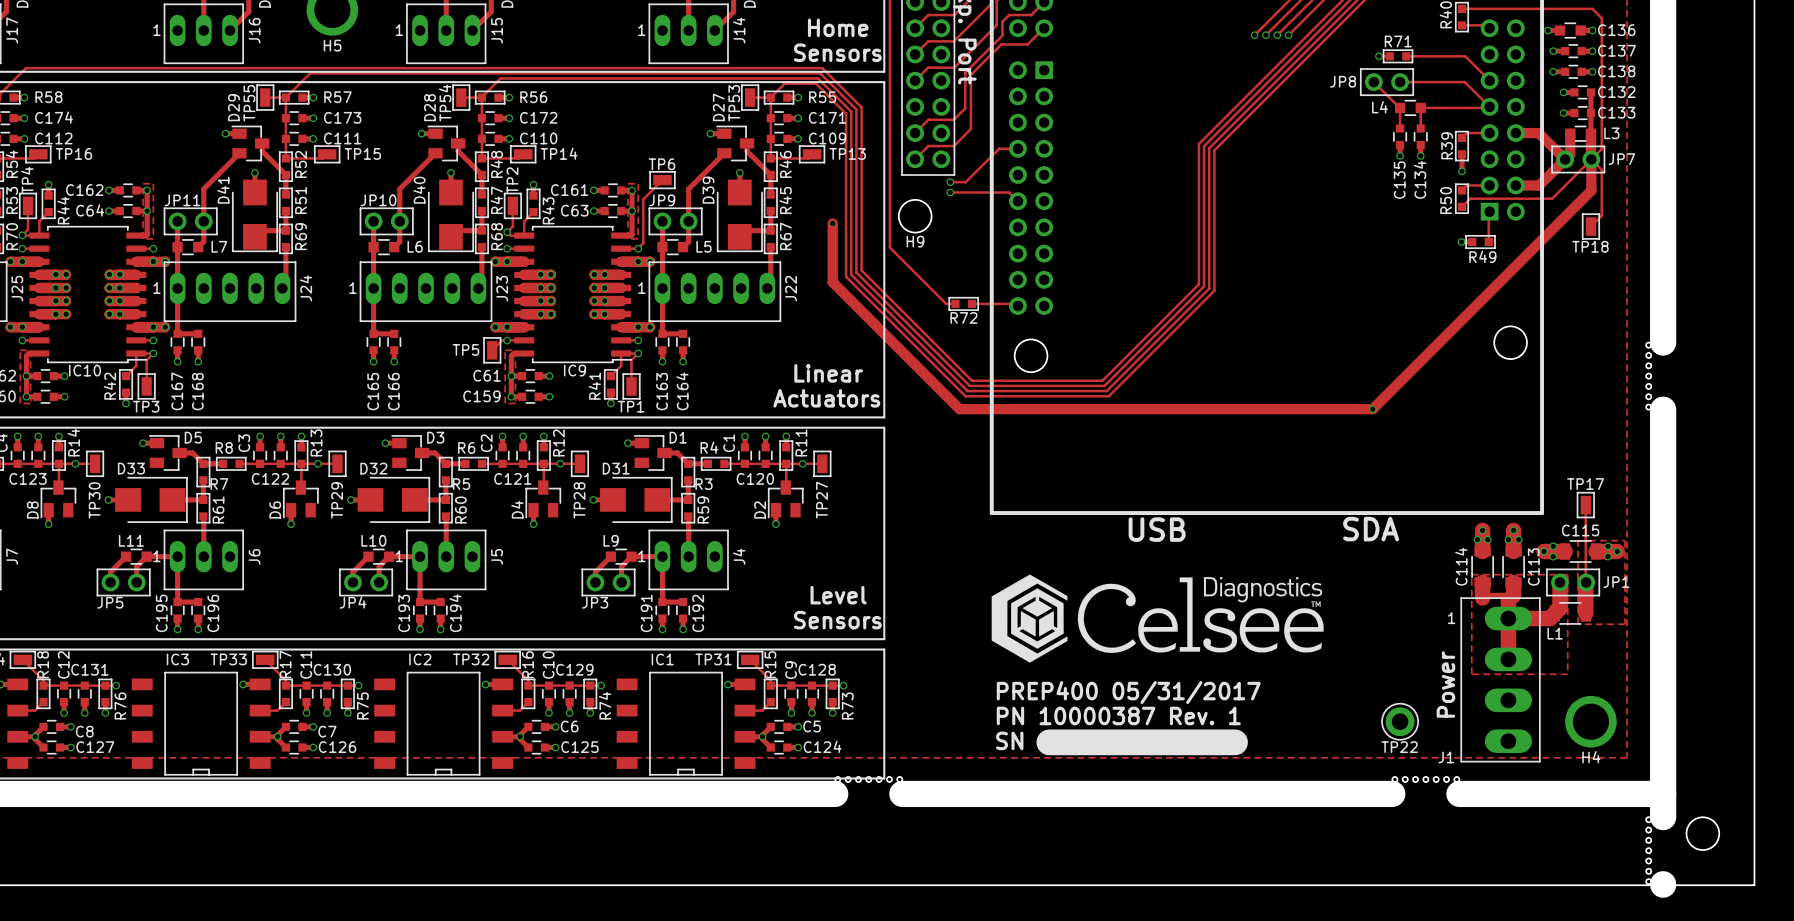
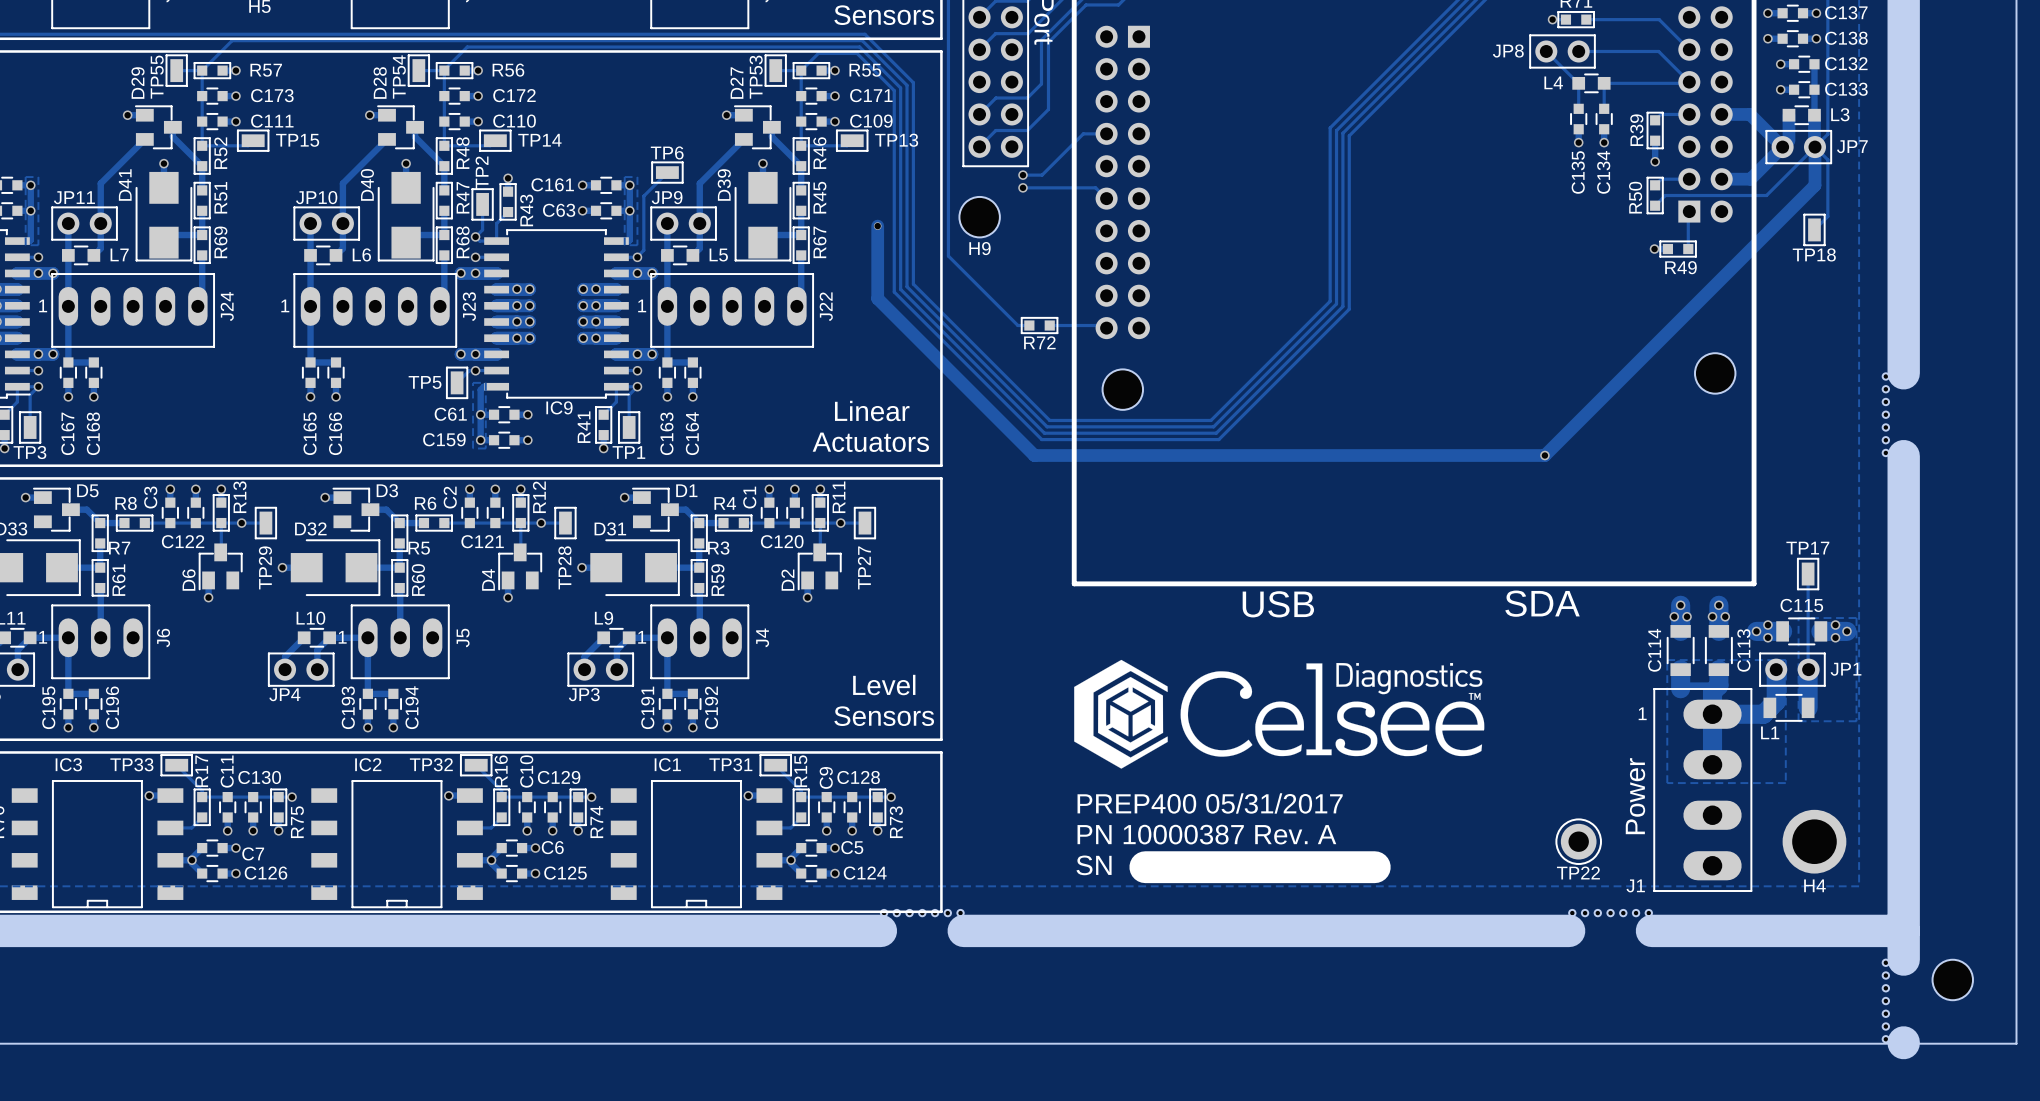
text: PN 10000387 Rev. 1 (1118, 715) -> PN 10000387 Rev. A (1206, 834)

